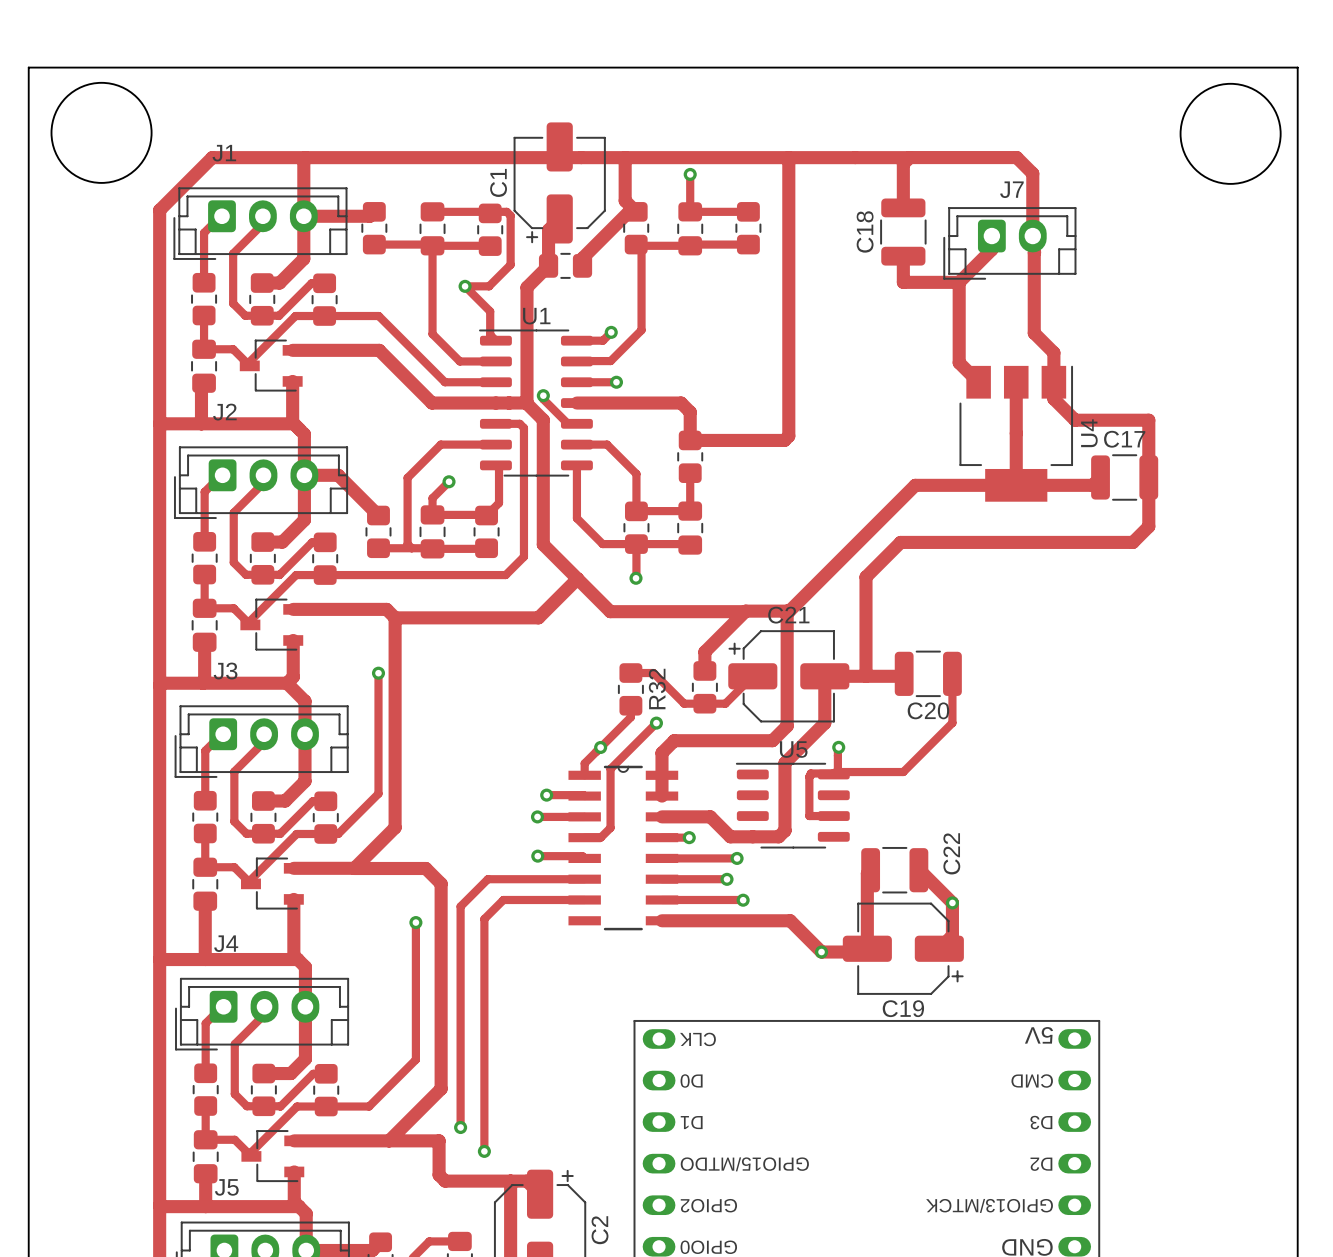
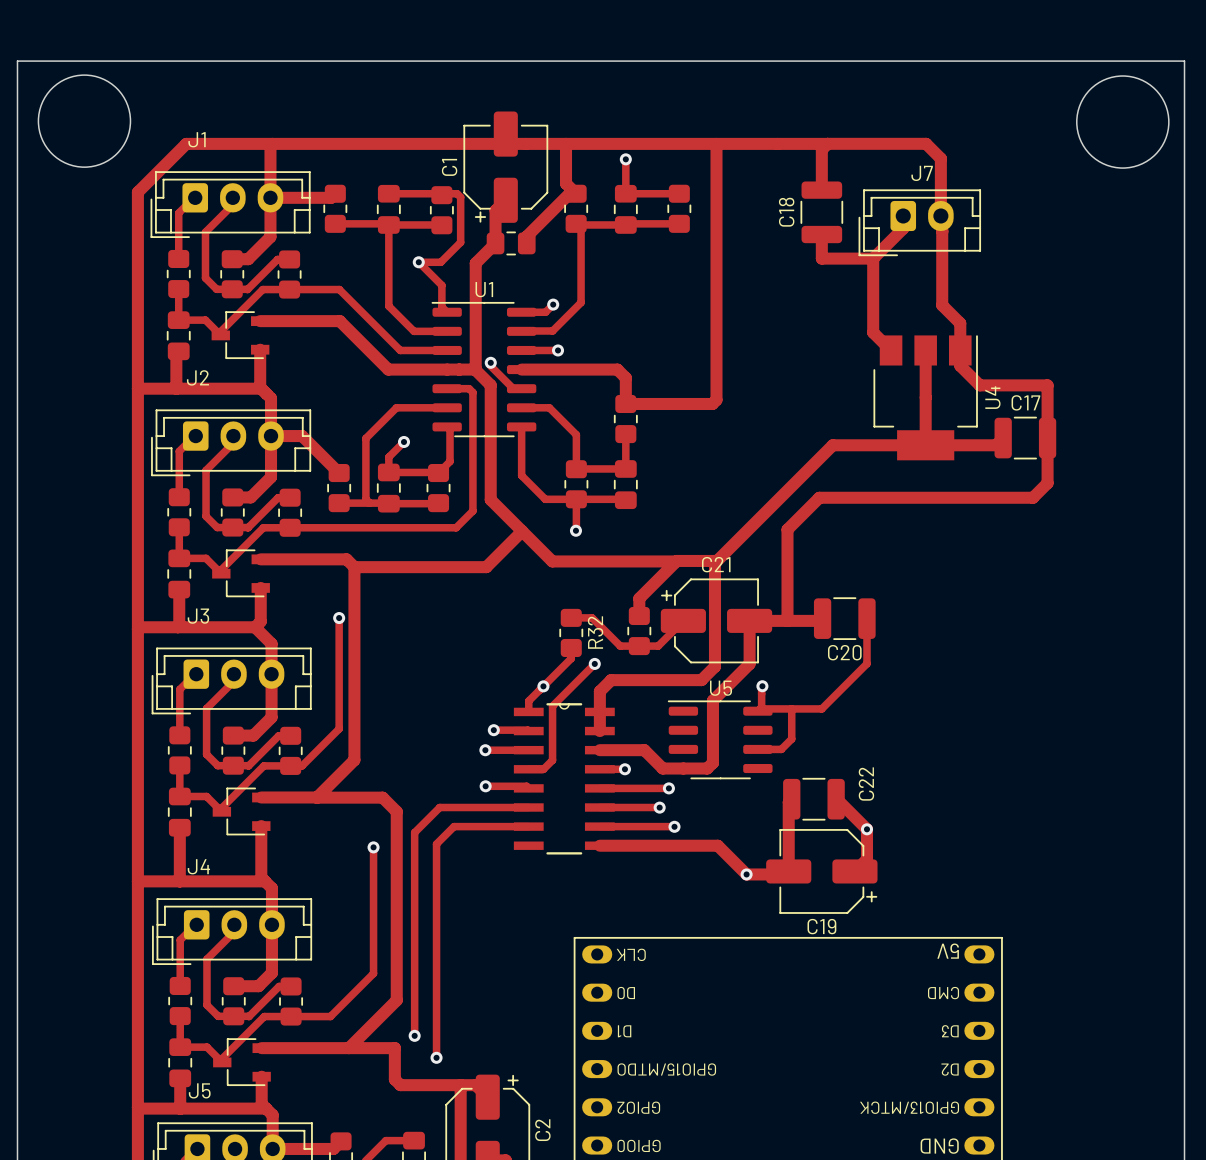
track: (833, 774) (810, 773) (809, 776) (809, 816) (833, 816) -> (791, 708) (791, 739) (781, 749) (757, 749)

